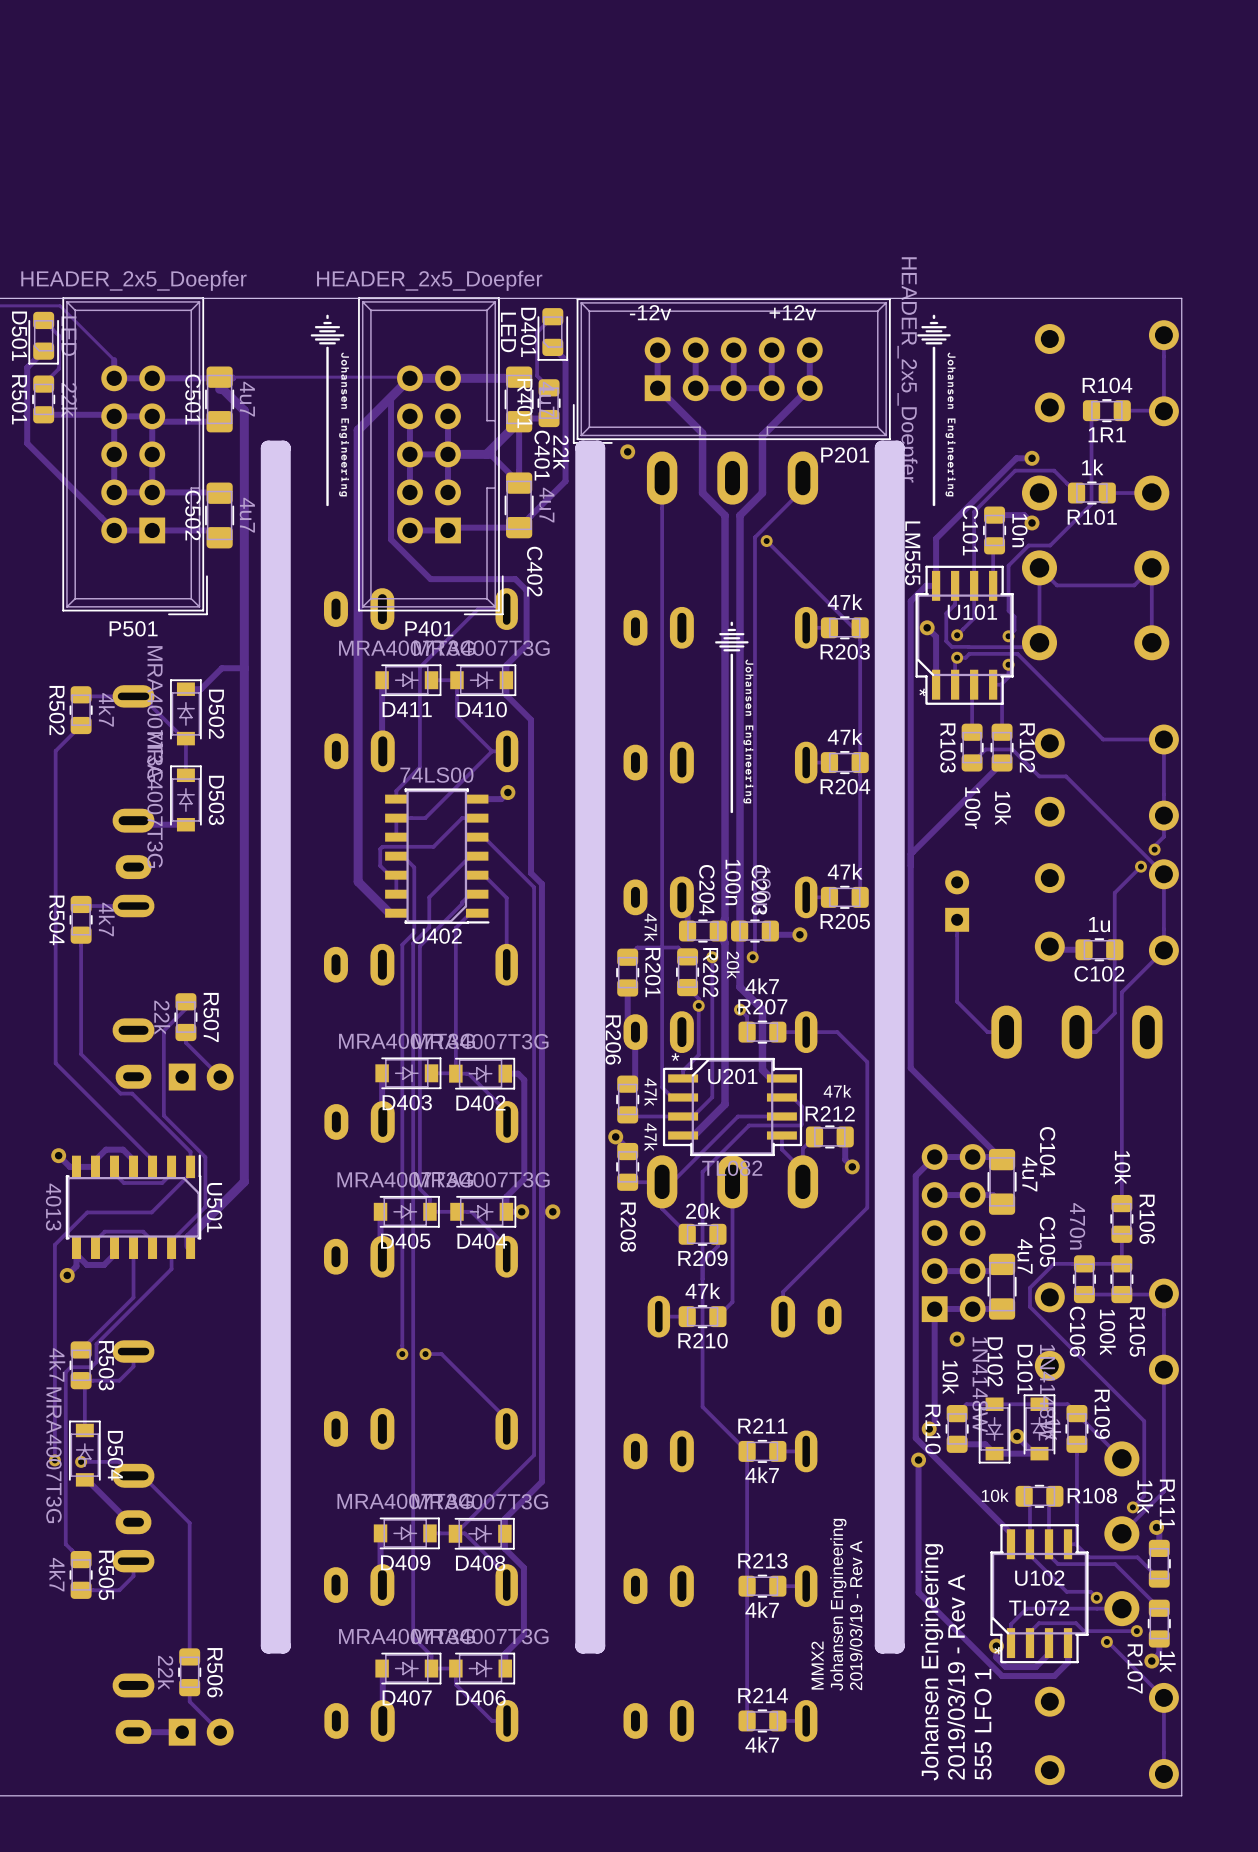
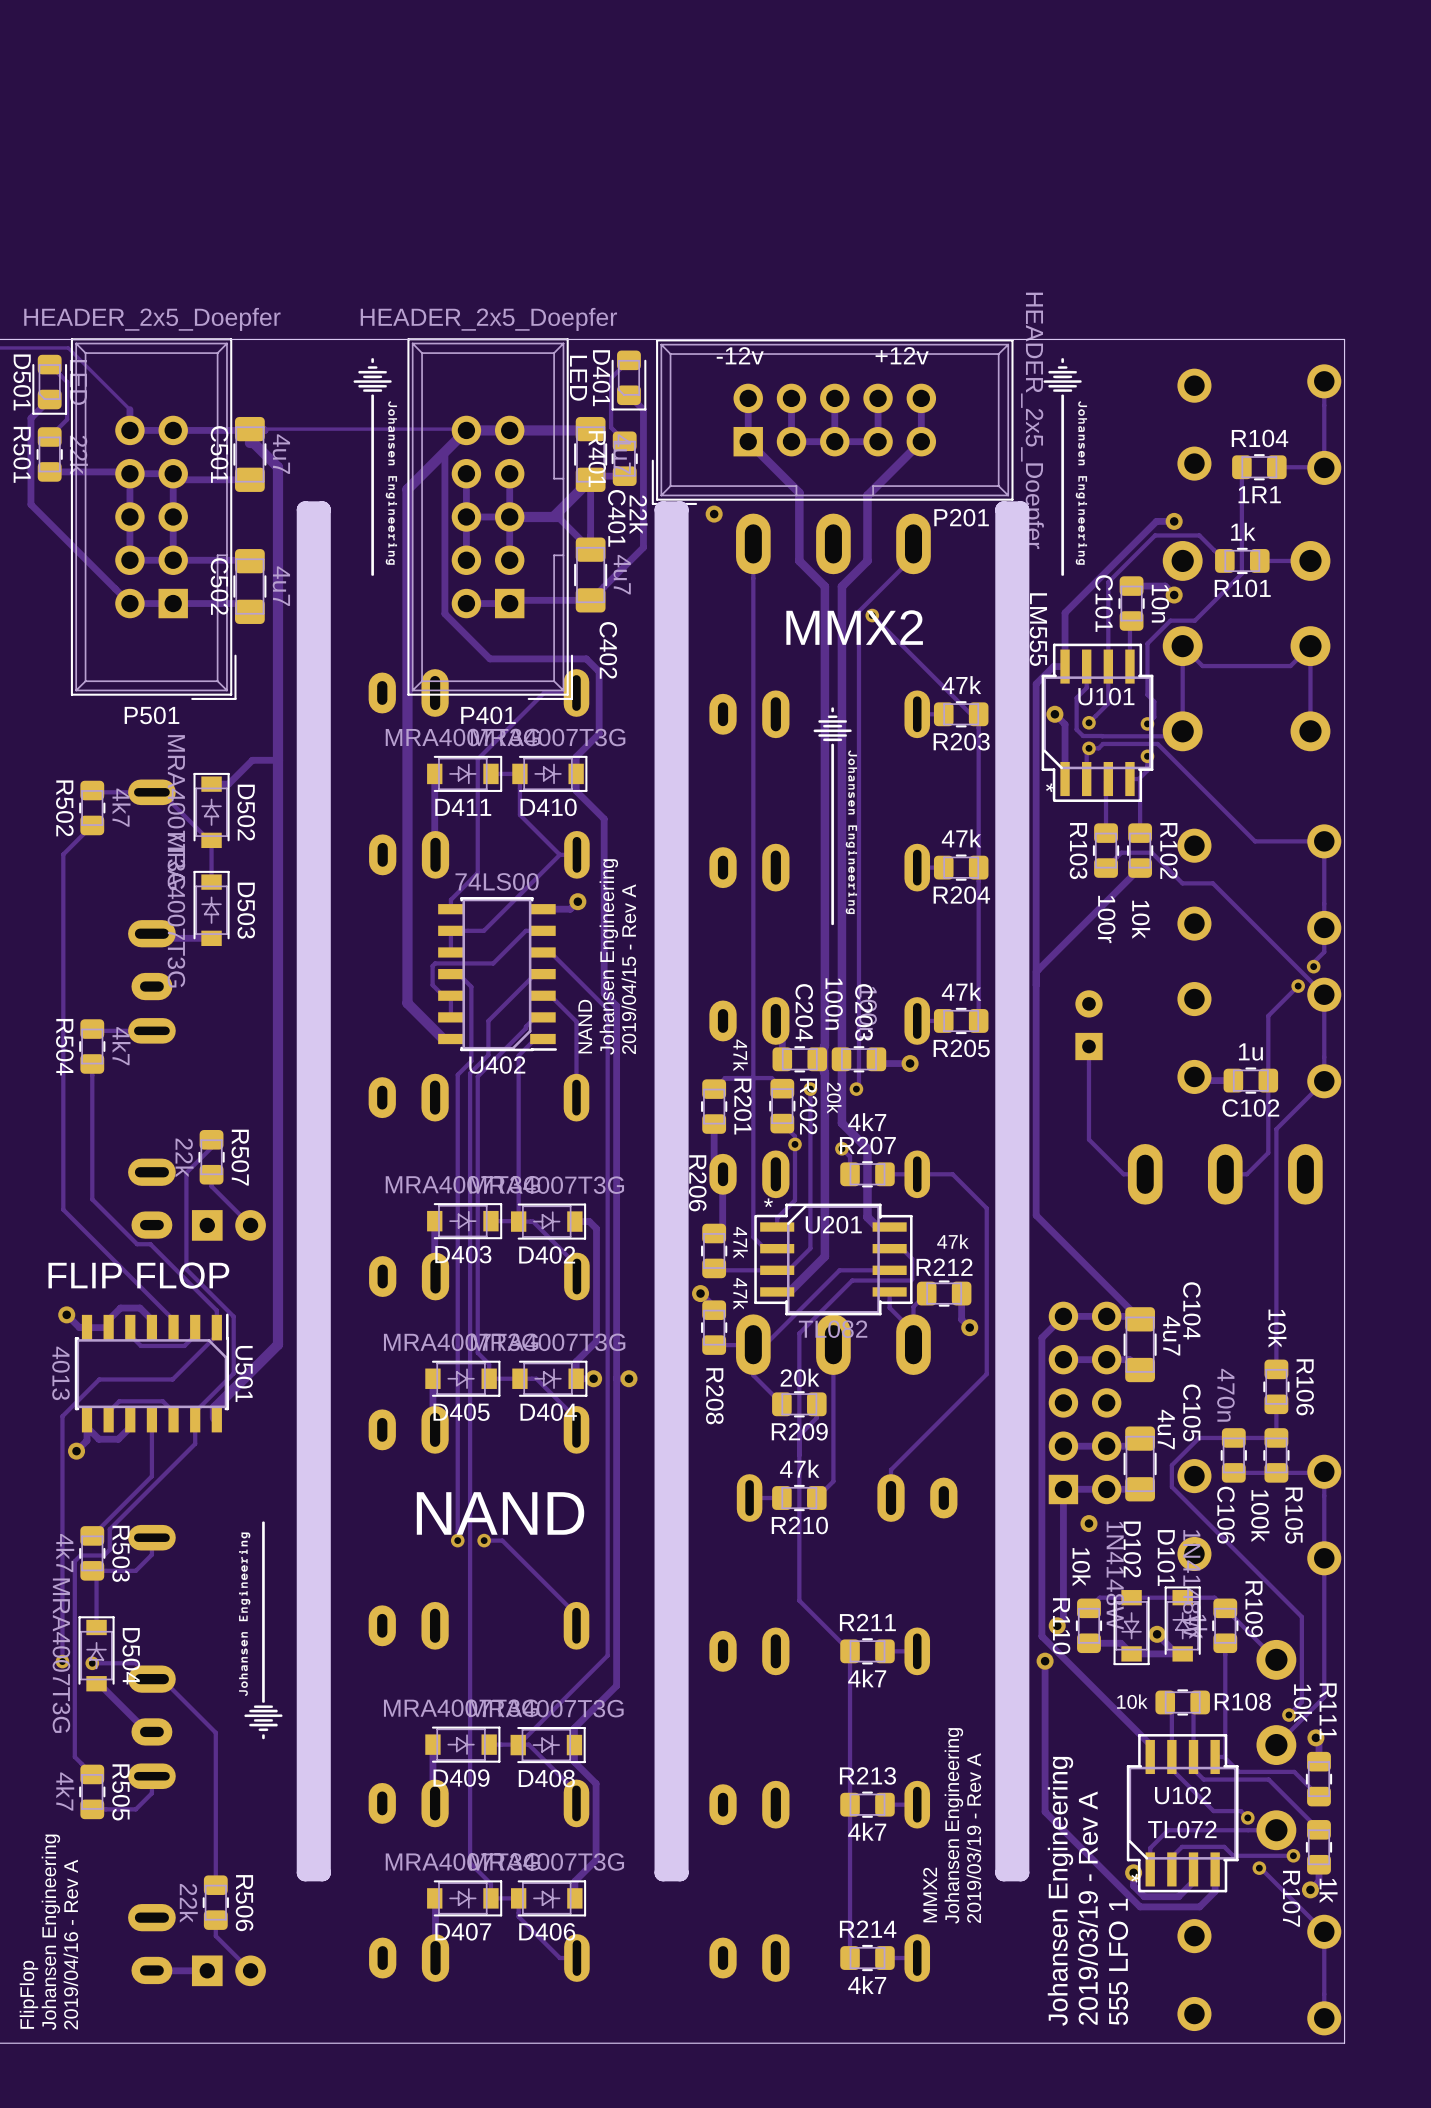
text: none -> MMX2 (854, 627)
text: none -> Johansen Engineering (608, 956)
text: none -> 2019/04/15 - Rev A (628, 969)
text: none -> NAND (585, 1026)
text: none -> FLIP FLOP (138, 1275)
text: none -> NAND (500, 1513)
drawing: none -> [239, 1521, 283, 1740]
text: none -> Johansen Engineering (50, 1932)
text: none -> 2019/04/16 - Rev A (70, 1944)
text: none -> FlipFlop (28, 1994)

